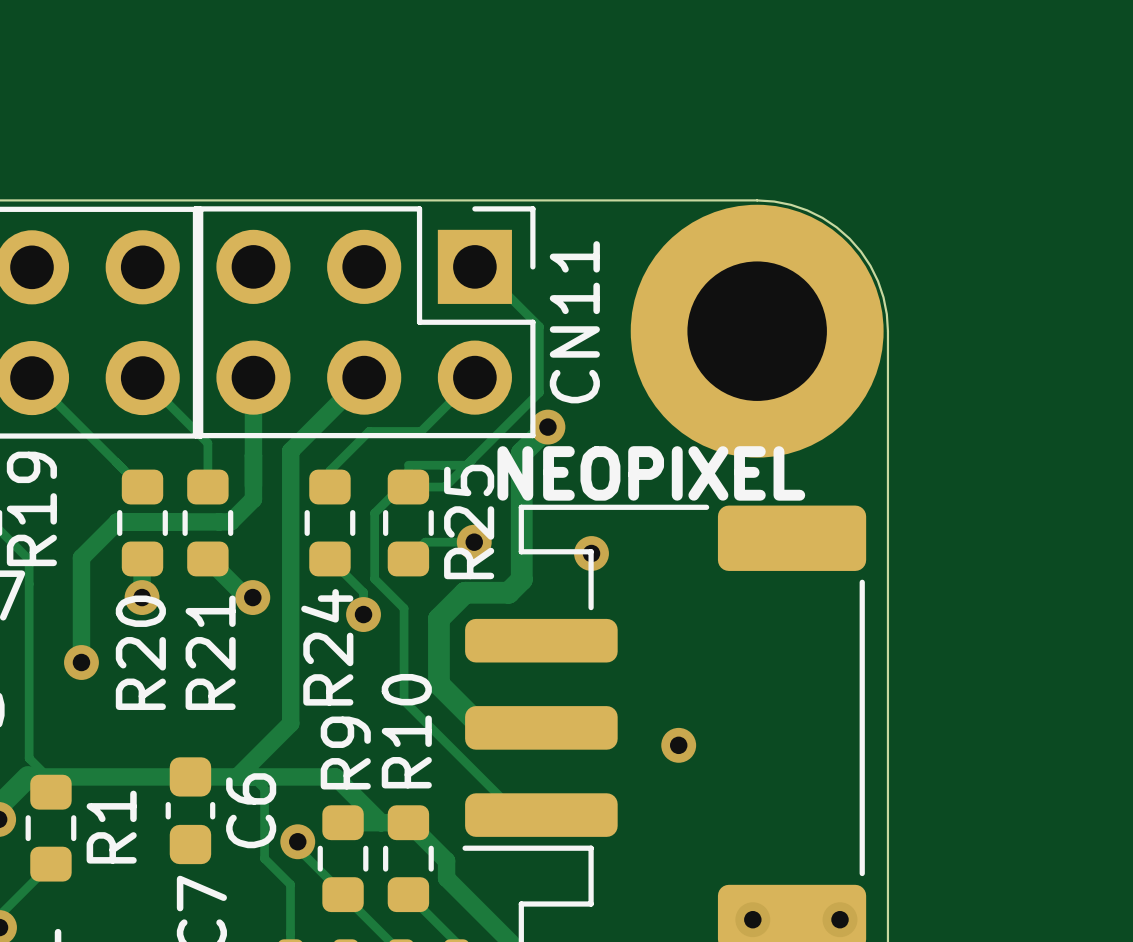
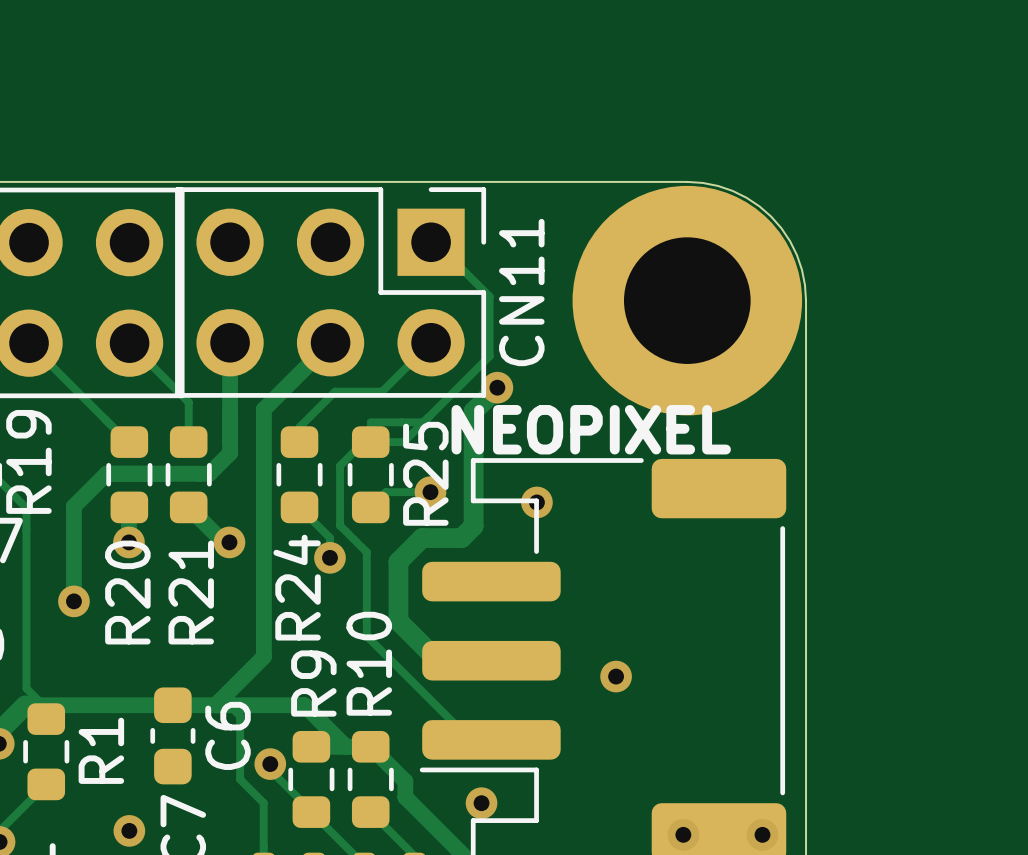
via: none -> (481, 803)
via: none -> (129, 830)

